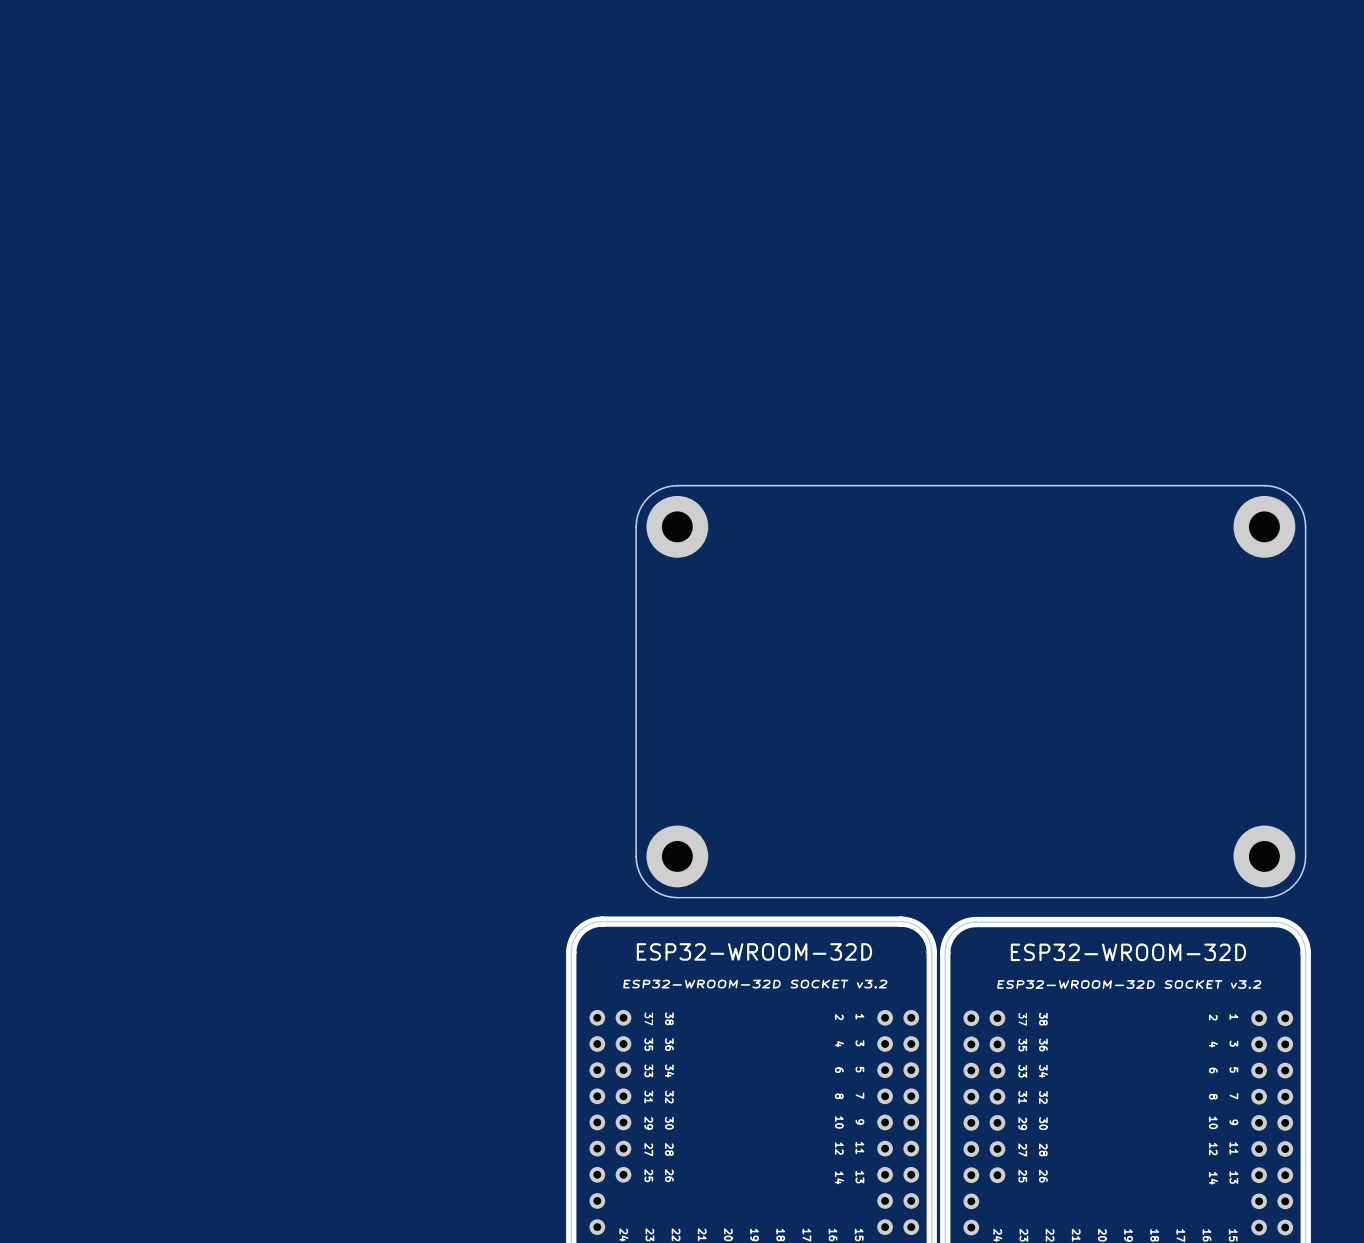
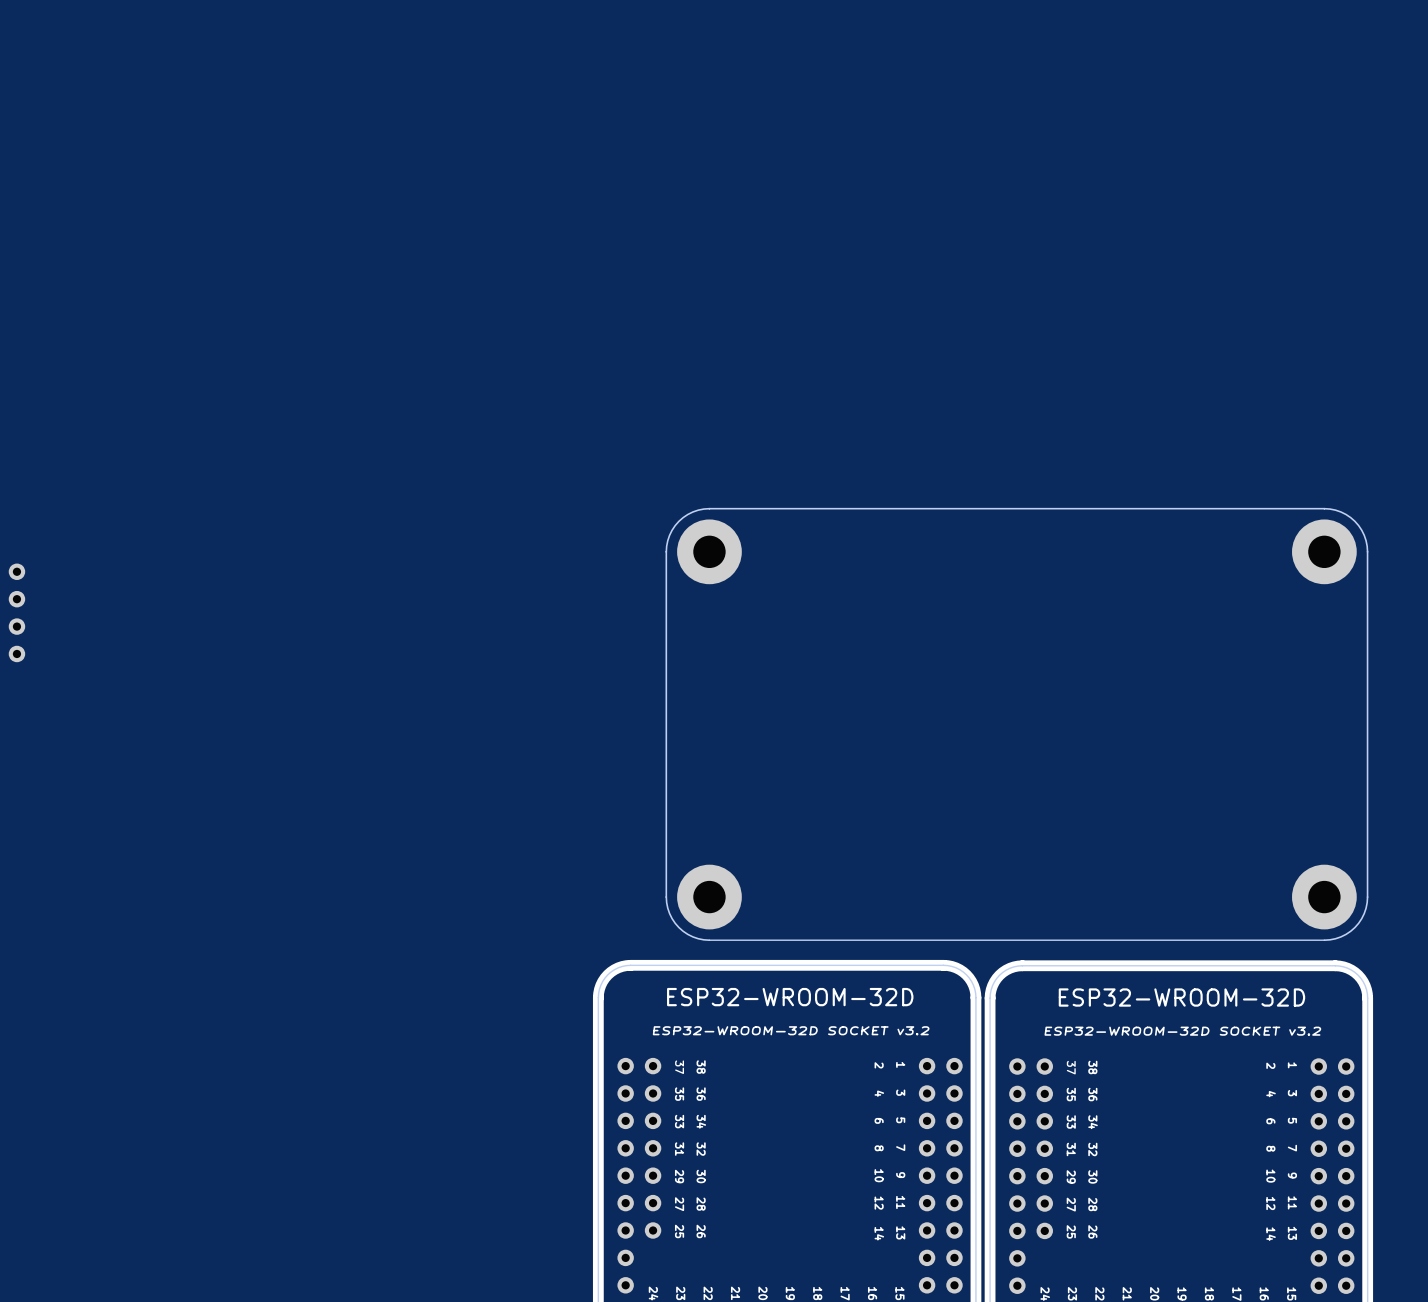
part: none -> (16, 612)

